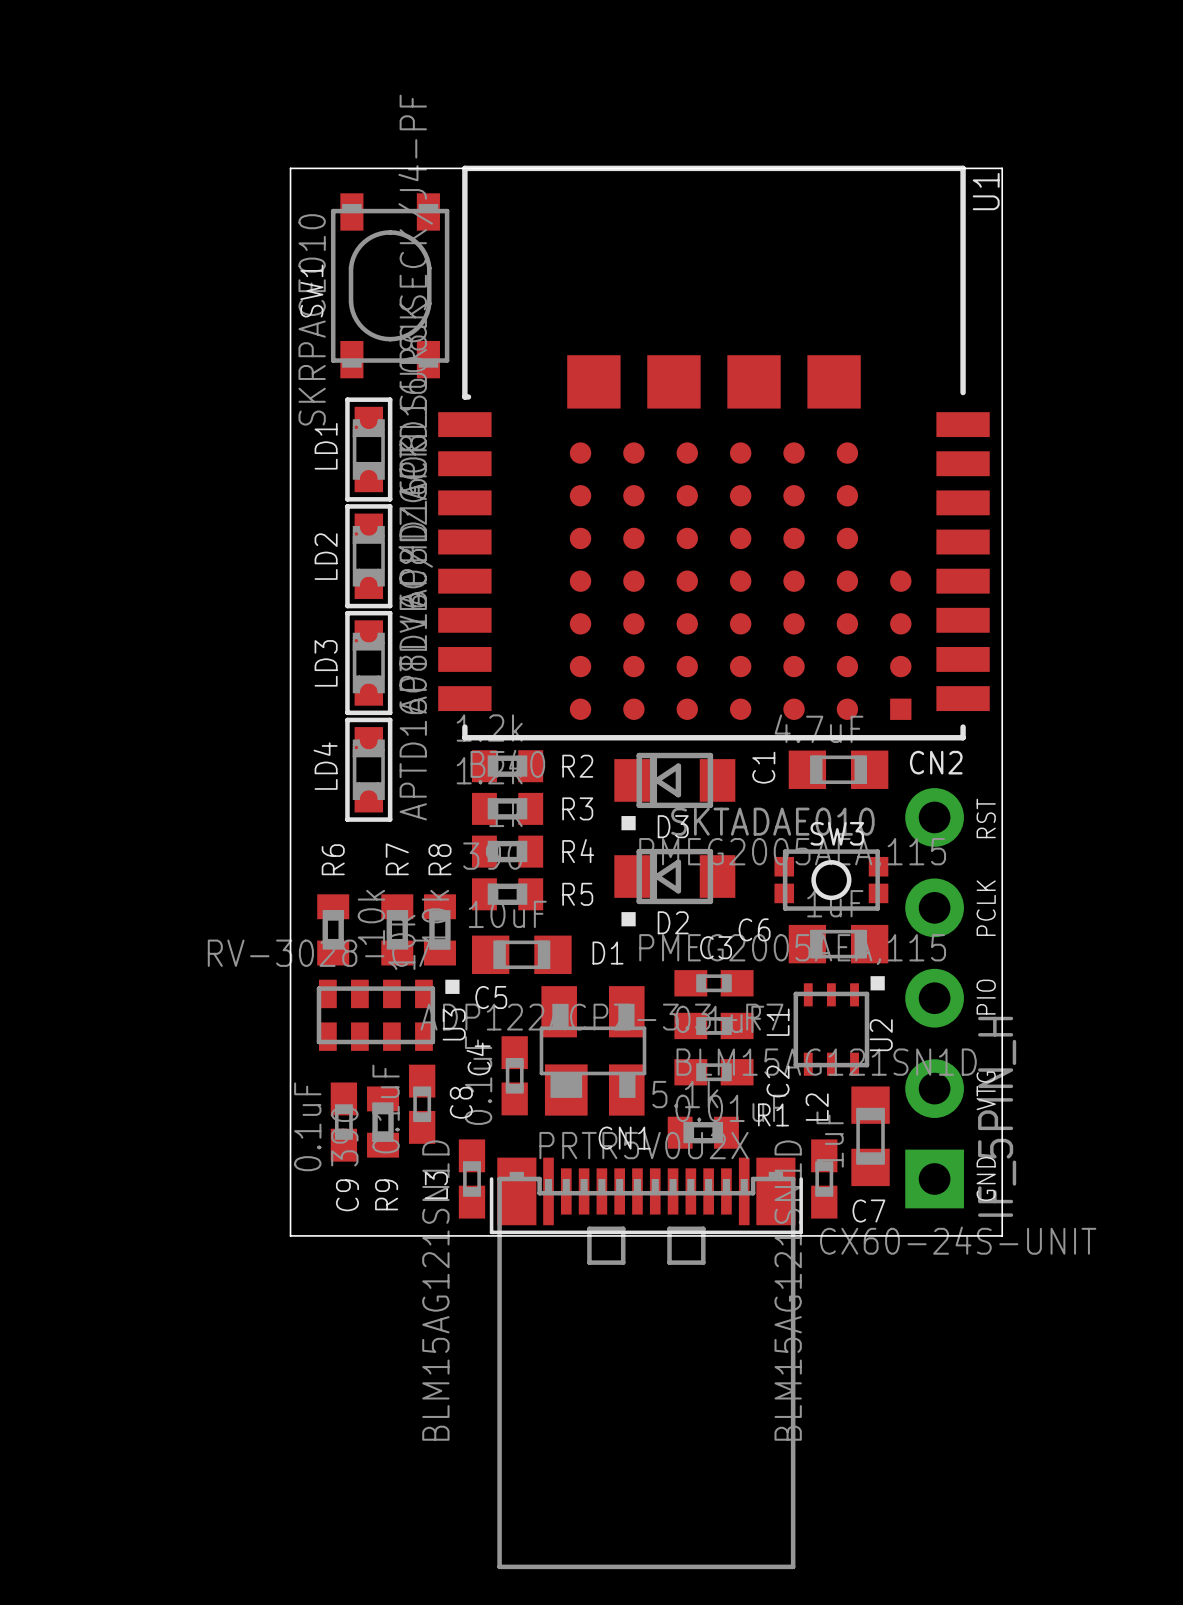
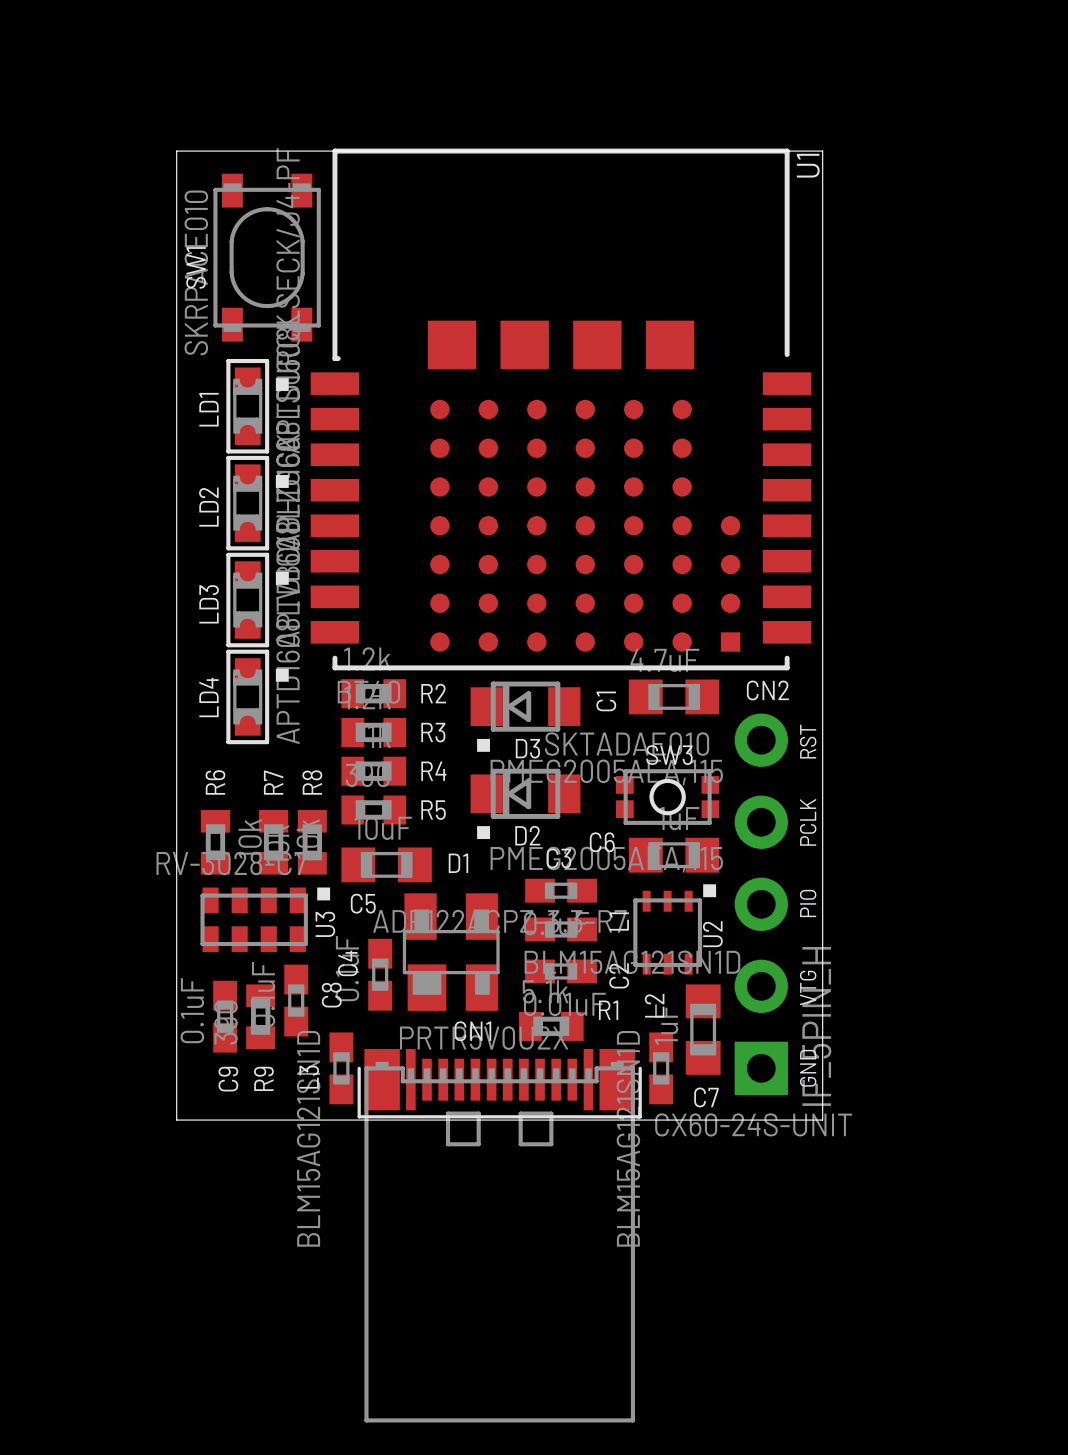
drawing: none -> [275, 378, 289, 392]
drawing: none -> [275, 475, 289, 488]
drawing: none -> [275, 571, 289, 585]
drawing: none -> [275, 668, 289, 682]

